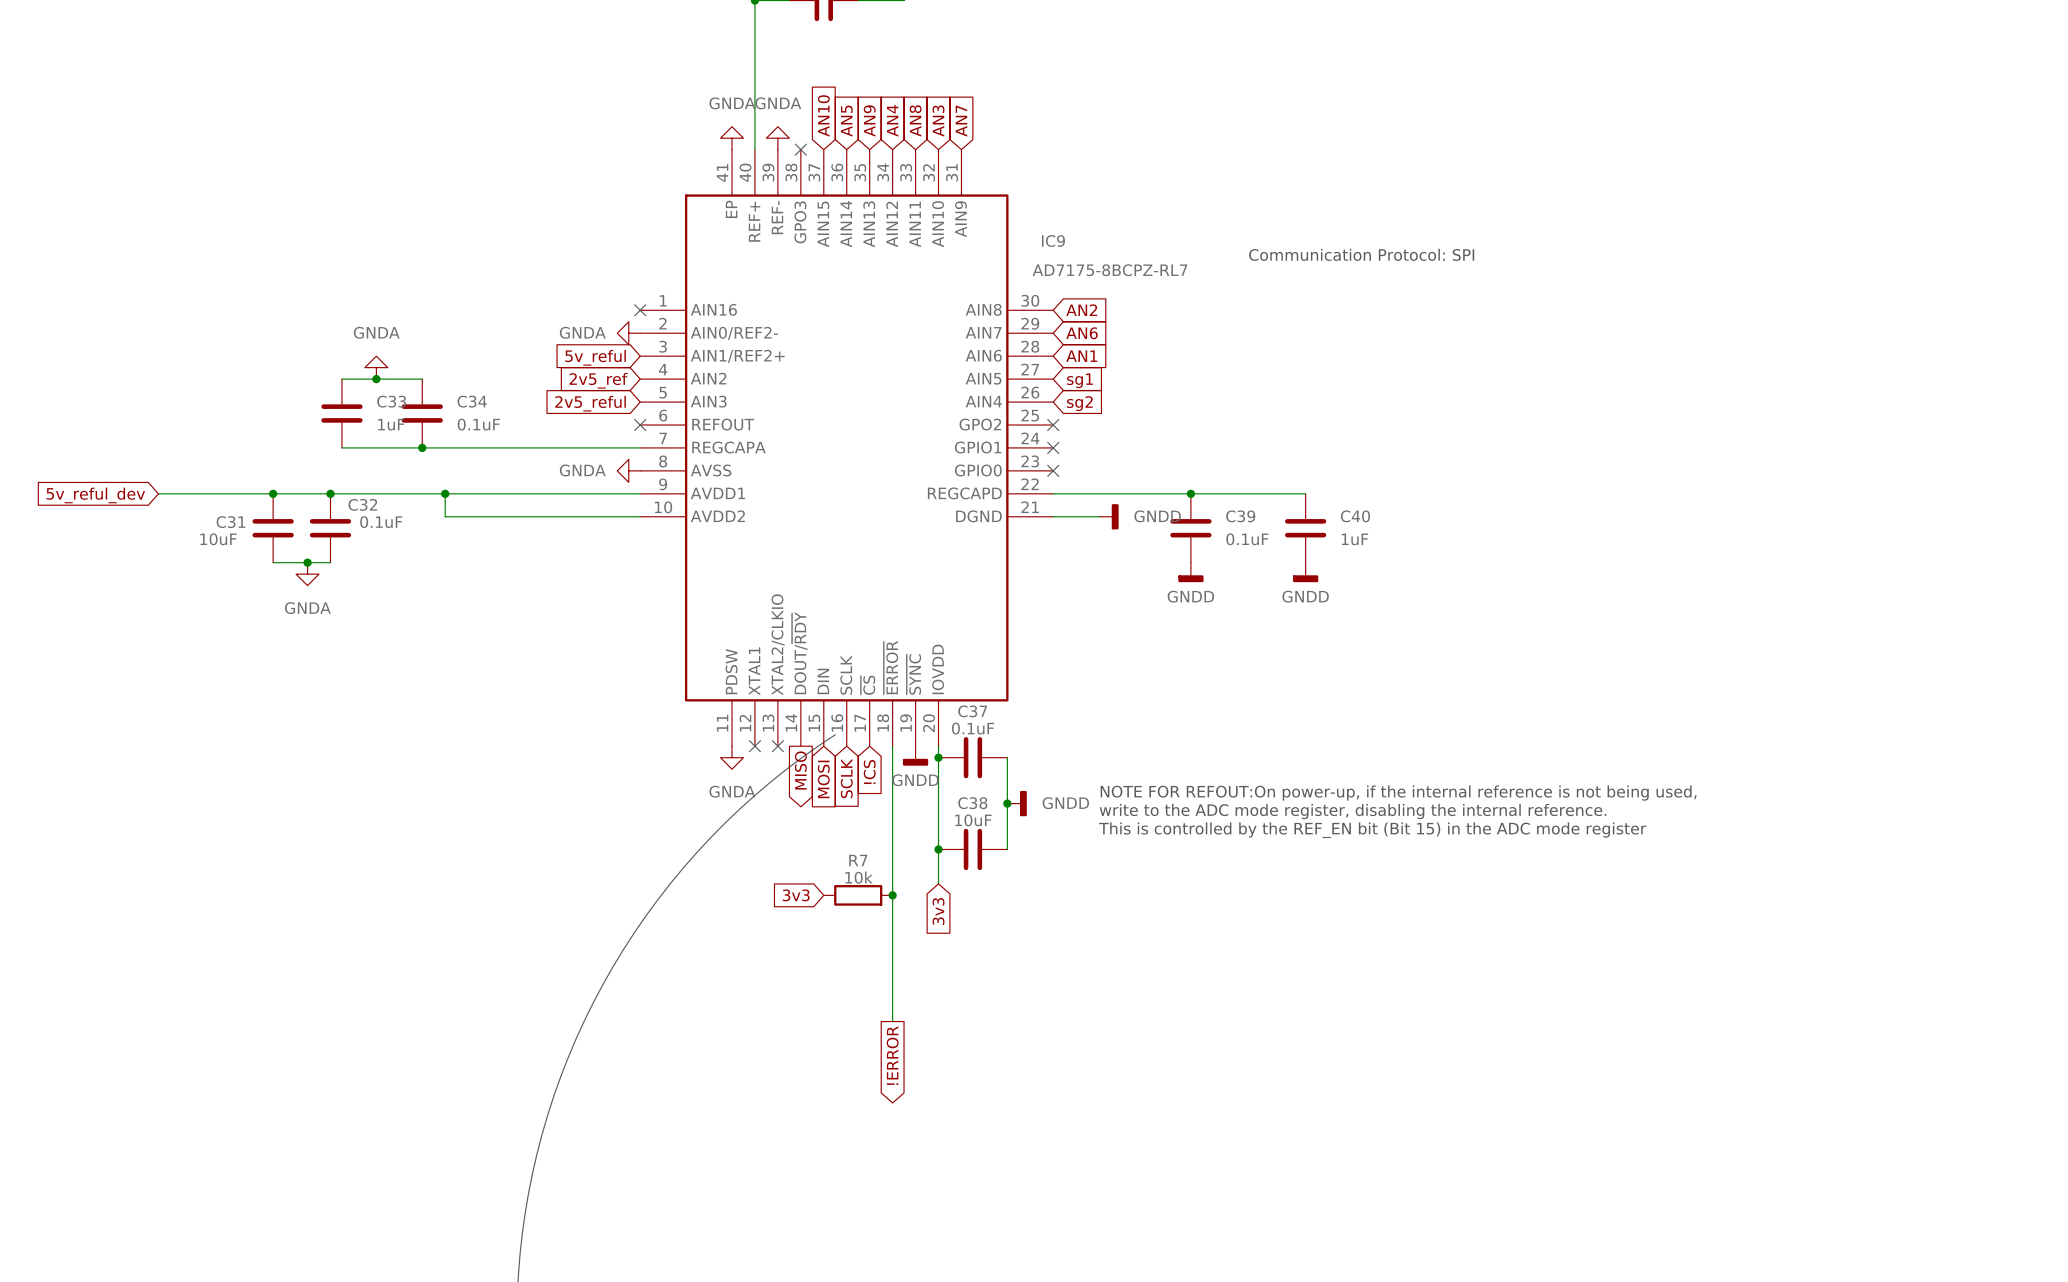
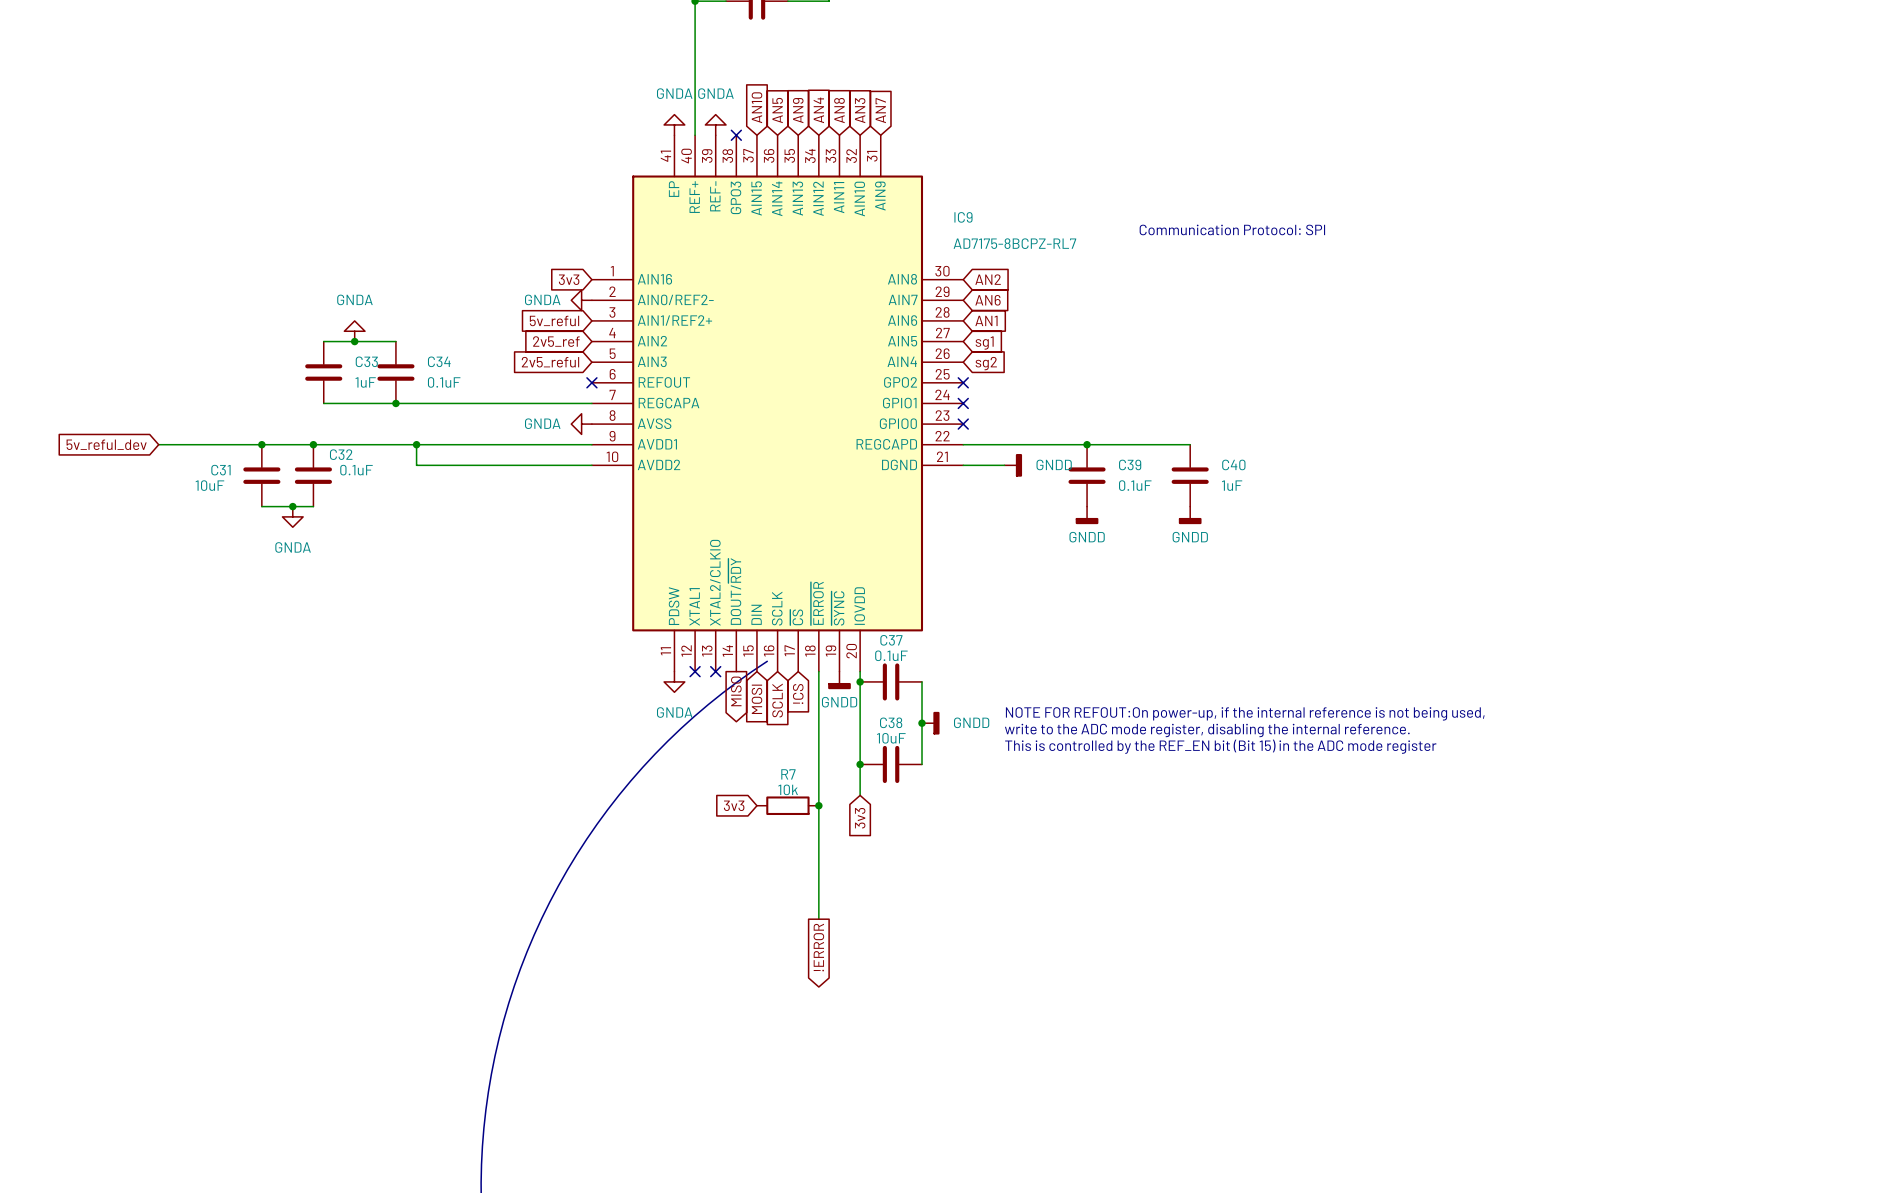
global label: none -> 3v3 (569, 279)
no-connect mark: (640, 310) -> none

